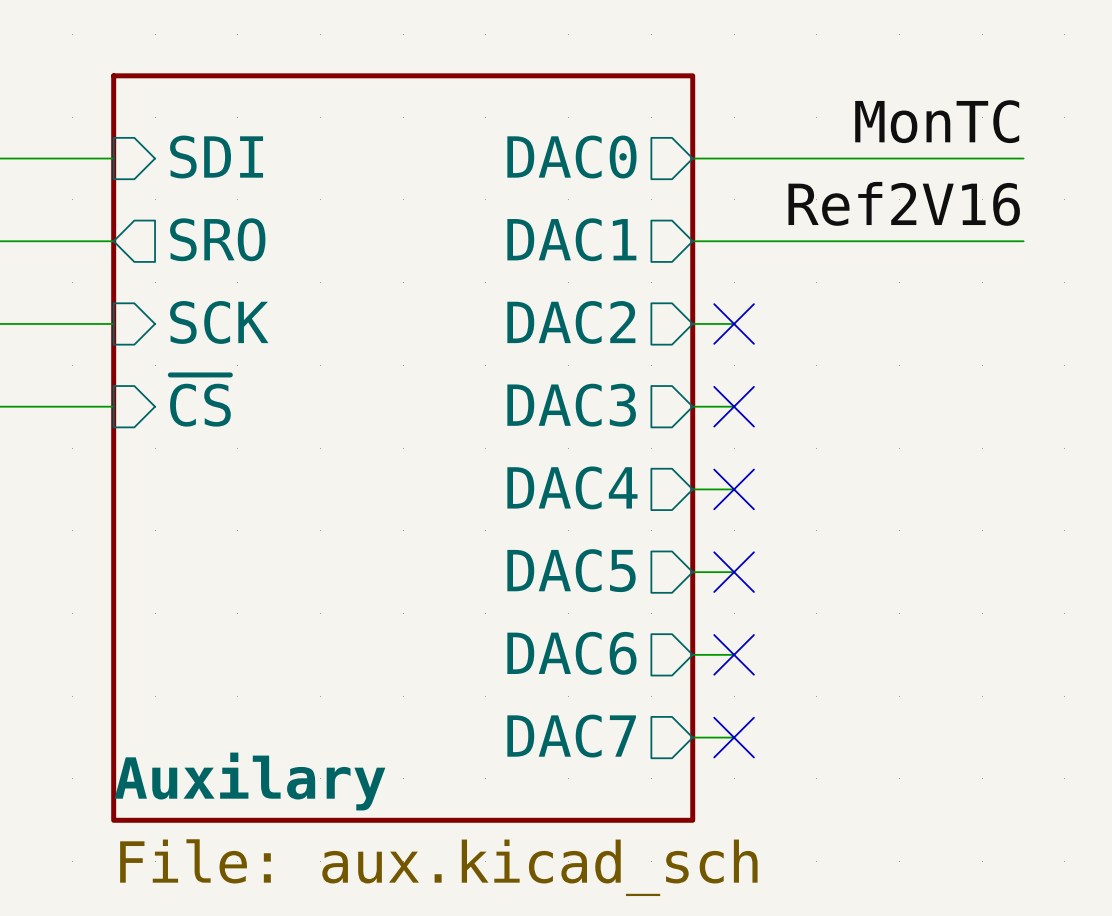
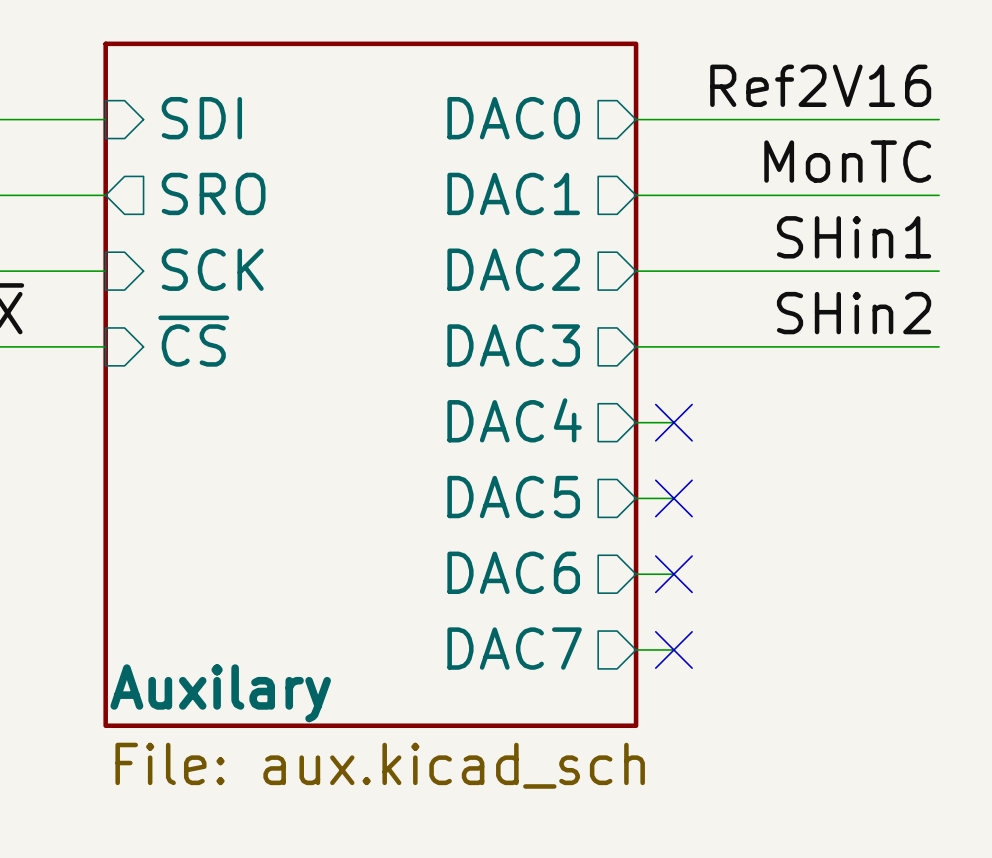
label: MonTC (937, 121) -> Ref2V16 (820, 85)
label: Ref2V16 (904, 203) -> MonTC (847, 161)
label: none -> SHin1 (854, 237)
wire: none -> (673, 271) (939, 271)
no-connect mark: (734, 323) -> none
label: none -> SHin2 (854, 313)
wire: none -> (673, 346) (939, 346)
no-connect mark: (734, 406) -> none

